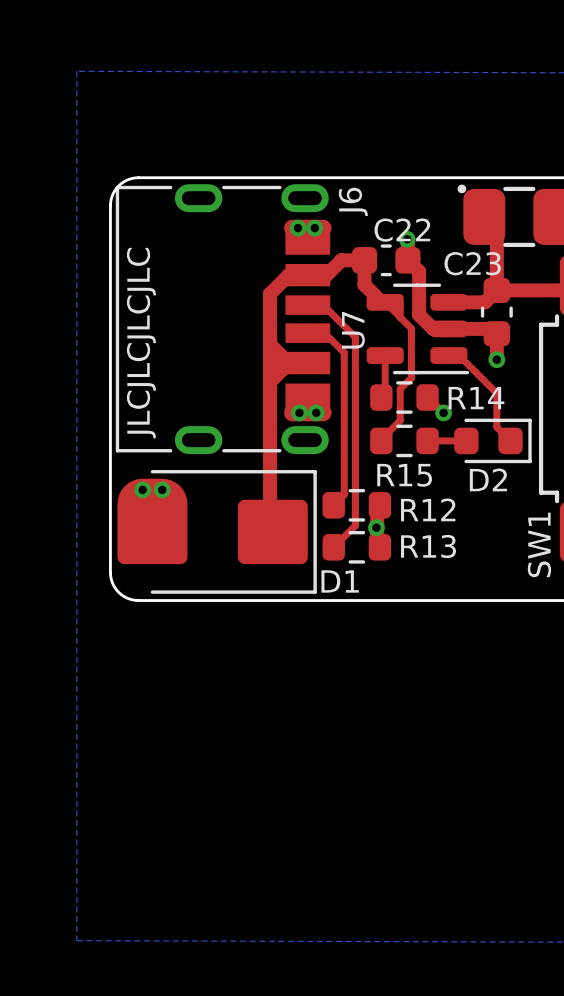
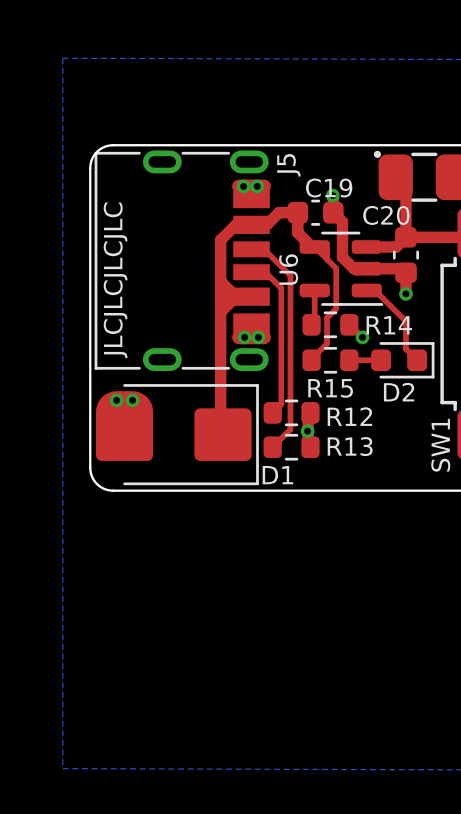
J6 name: J6 (353, 201) -> J5 (288, 165)
C22 name: C22 (402, 230) -> C19 (329, 188)
C23 name: C23 (472, 263) -> C20 (386, 215)
U7 name: U7 (353, 330) -> U6 (288, 269)

